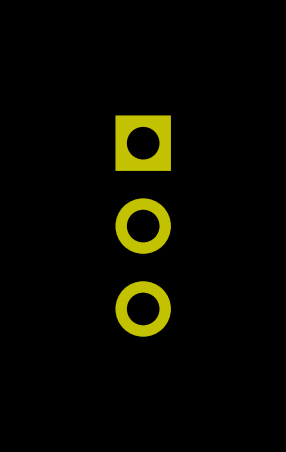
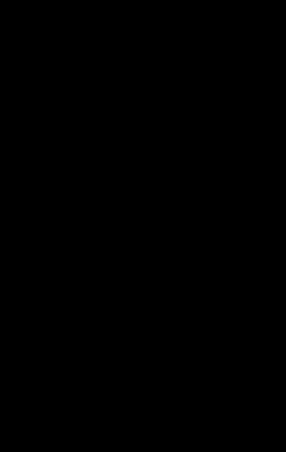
part: (143, 226) -> none

